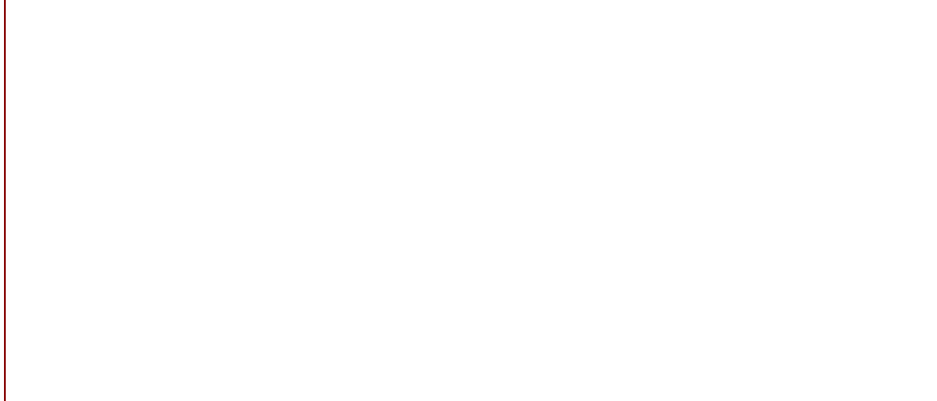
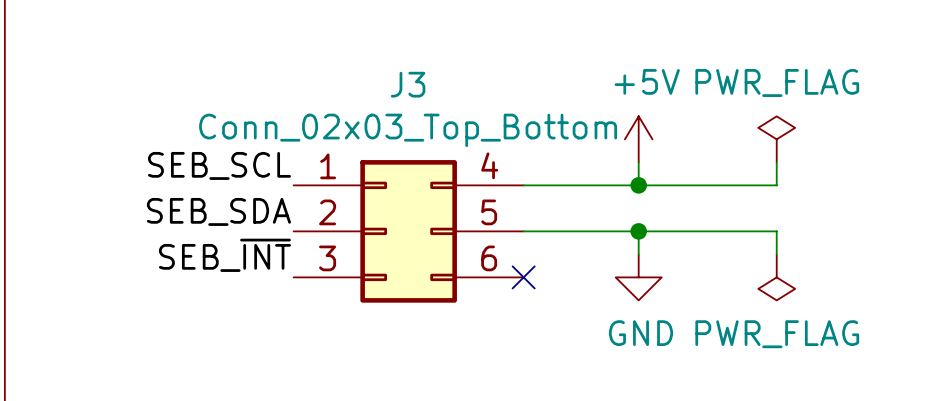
power symbol: none -> +5V (638, 139)
power symbol: none -> PWR_FLAG (776, 139)
wire: none -> (638, 162) (638, 185)
wire: none -> (776, 162) (776, 185) (523, 185)
label: none -> SEB_SCL (219, 165)
junction: none -> (638, 185)
label: none -> SEB_SDA (218, 211)
J3: none -> Conn_02x03_Top_Bottom (408, 231)
wire: none -> (523, 231) (776, 231) (776, 254)
wire: none -> (638, 231) (638, 254)
junction: none -> (638, 231)
label: none -> SEB_~{INT} (224, 255)
no-connect mark: none -> (523, 277)
power symbol: none -> GND (638, 277)
power symbol: none -> PWR_FLAG (776, 277)

